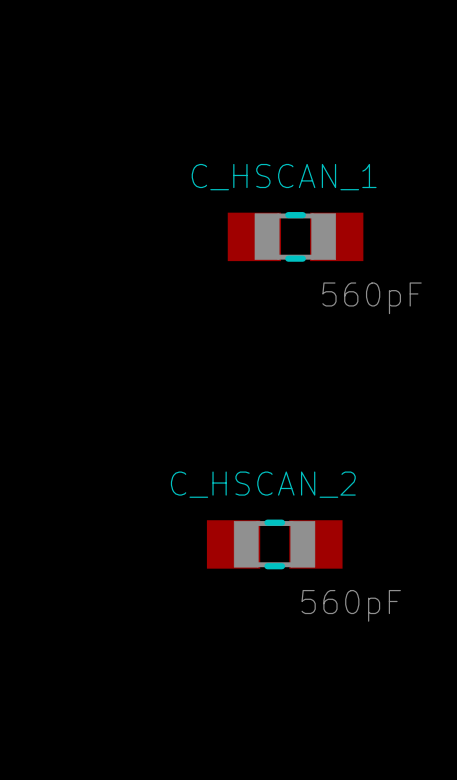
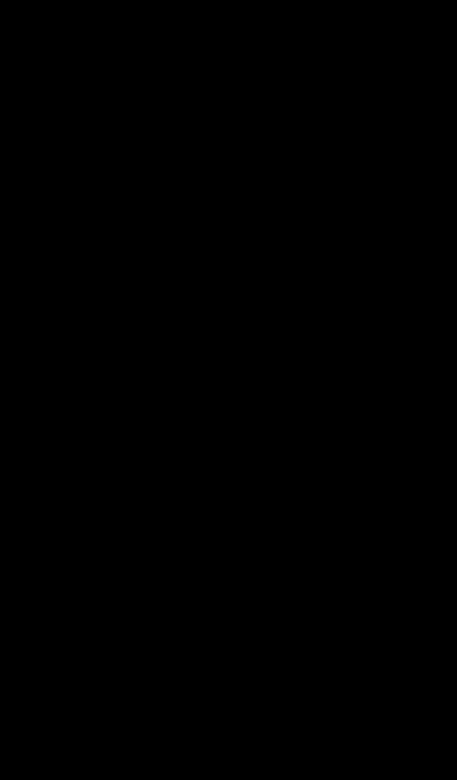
C_HSCAN_1: 560pF (295, 236) -> none
C_HSCAN_2: 560pF (274, 544) -> none

